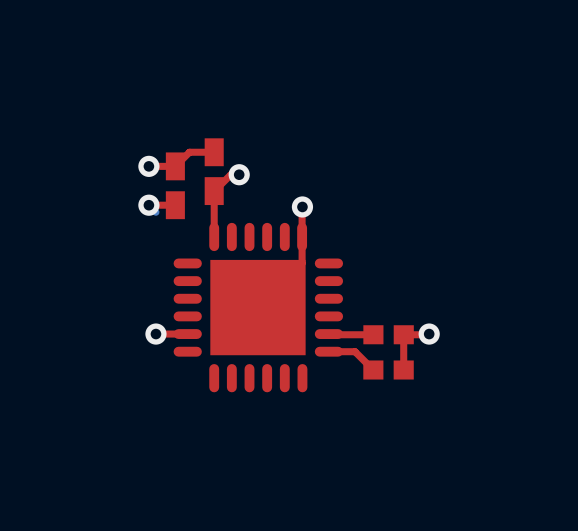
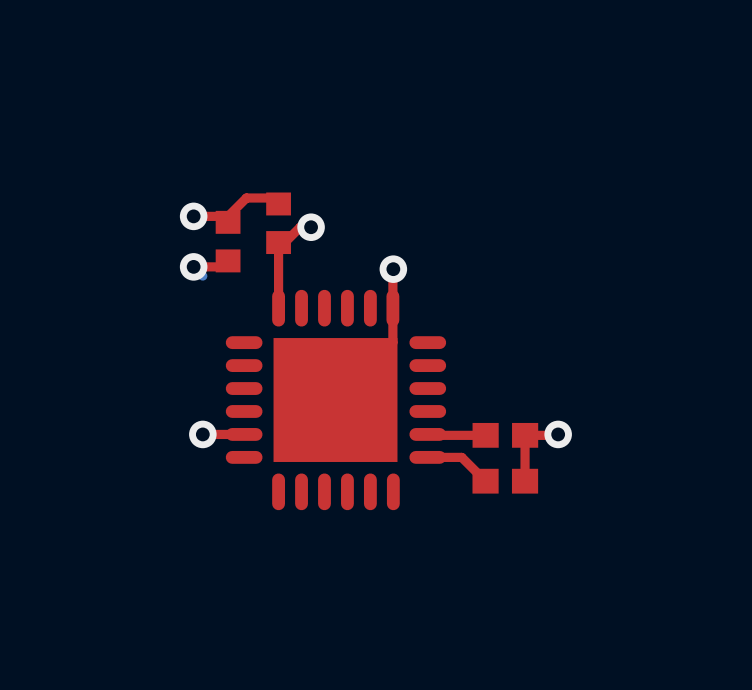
part footprint: [204, 138, 224, 206] -> [266, 192, 291, 255]
part footprint: [165, 152, 185, 220] -> [215, 210, 241, 273]

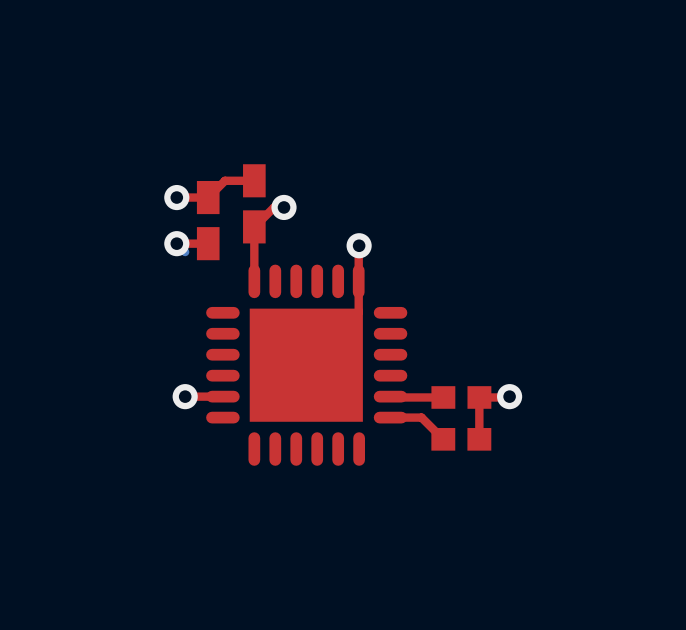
part footprint: [266, 192, 291, 255] -> [243, 164, 266, 244]
part footprint: [215, 210, 241, 273] -> [196, 180, 220, 261]

